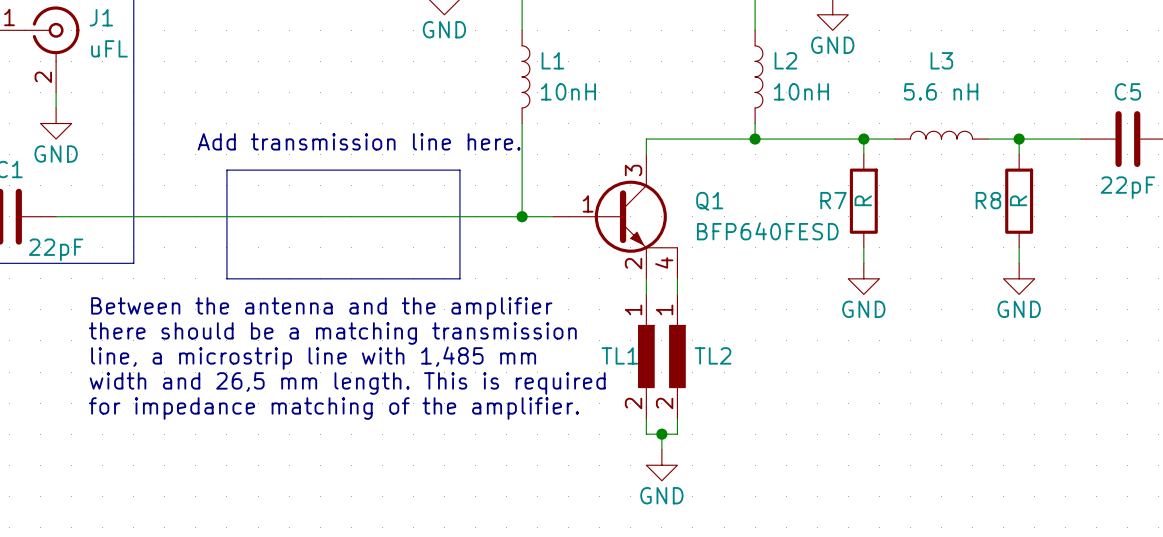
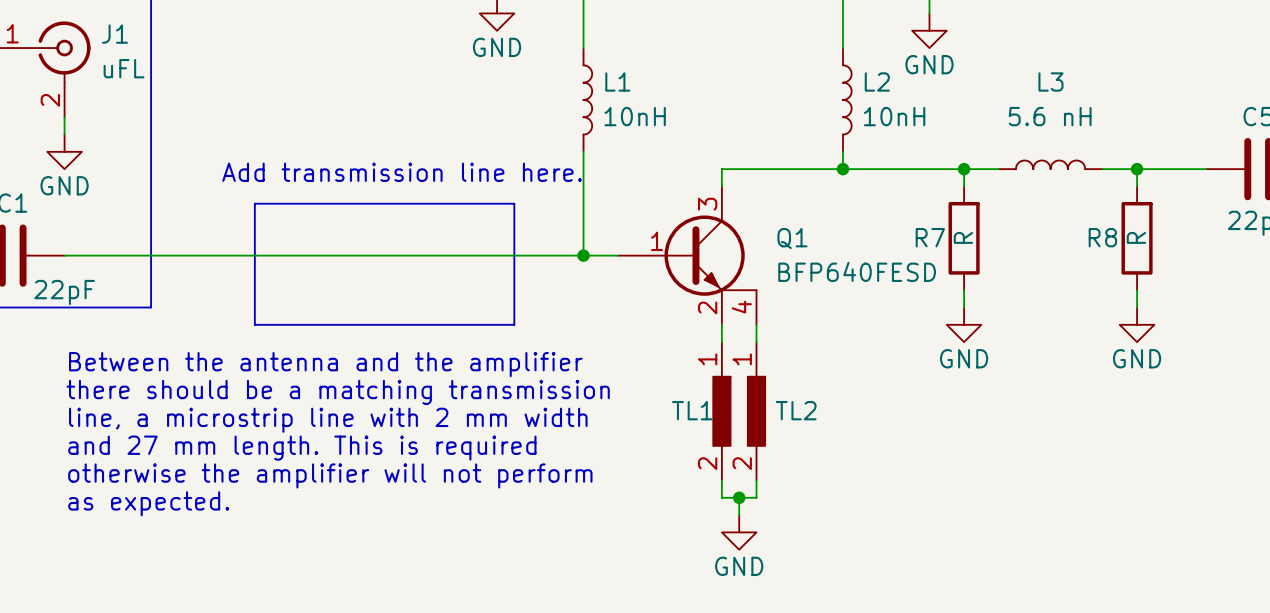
text position: Between the antenna and the amplifier (321, 308) -> Between the antenna and the amplifier (325, 364)
text position: there should be a matching transmission (332, 333) -> there should be a matching transmission (338, 392)
text: line, a microstrip line with 1,485 mm (313, 358) -> line, a microstrip line with 2 mm width (328, 420)
text: width and 26,5 mm length. This is required (347, 383) -> and 27 mm length. This is required (302, 448)
text: for impedance matching of the amplifier. (333, 408) -> none
text: none -> otherwise the amplifier will not perform (330, 475)
text: none -> as expected. (148, 503)

